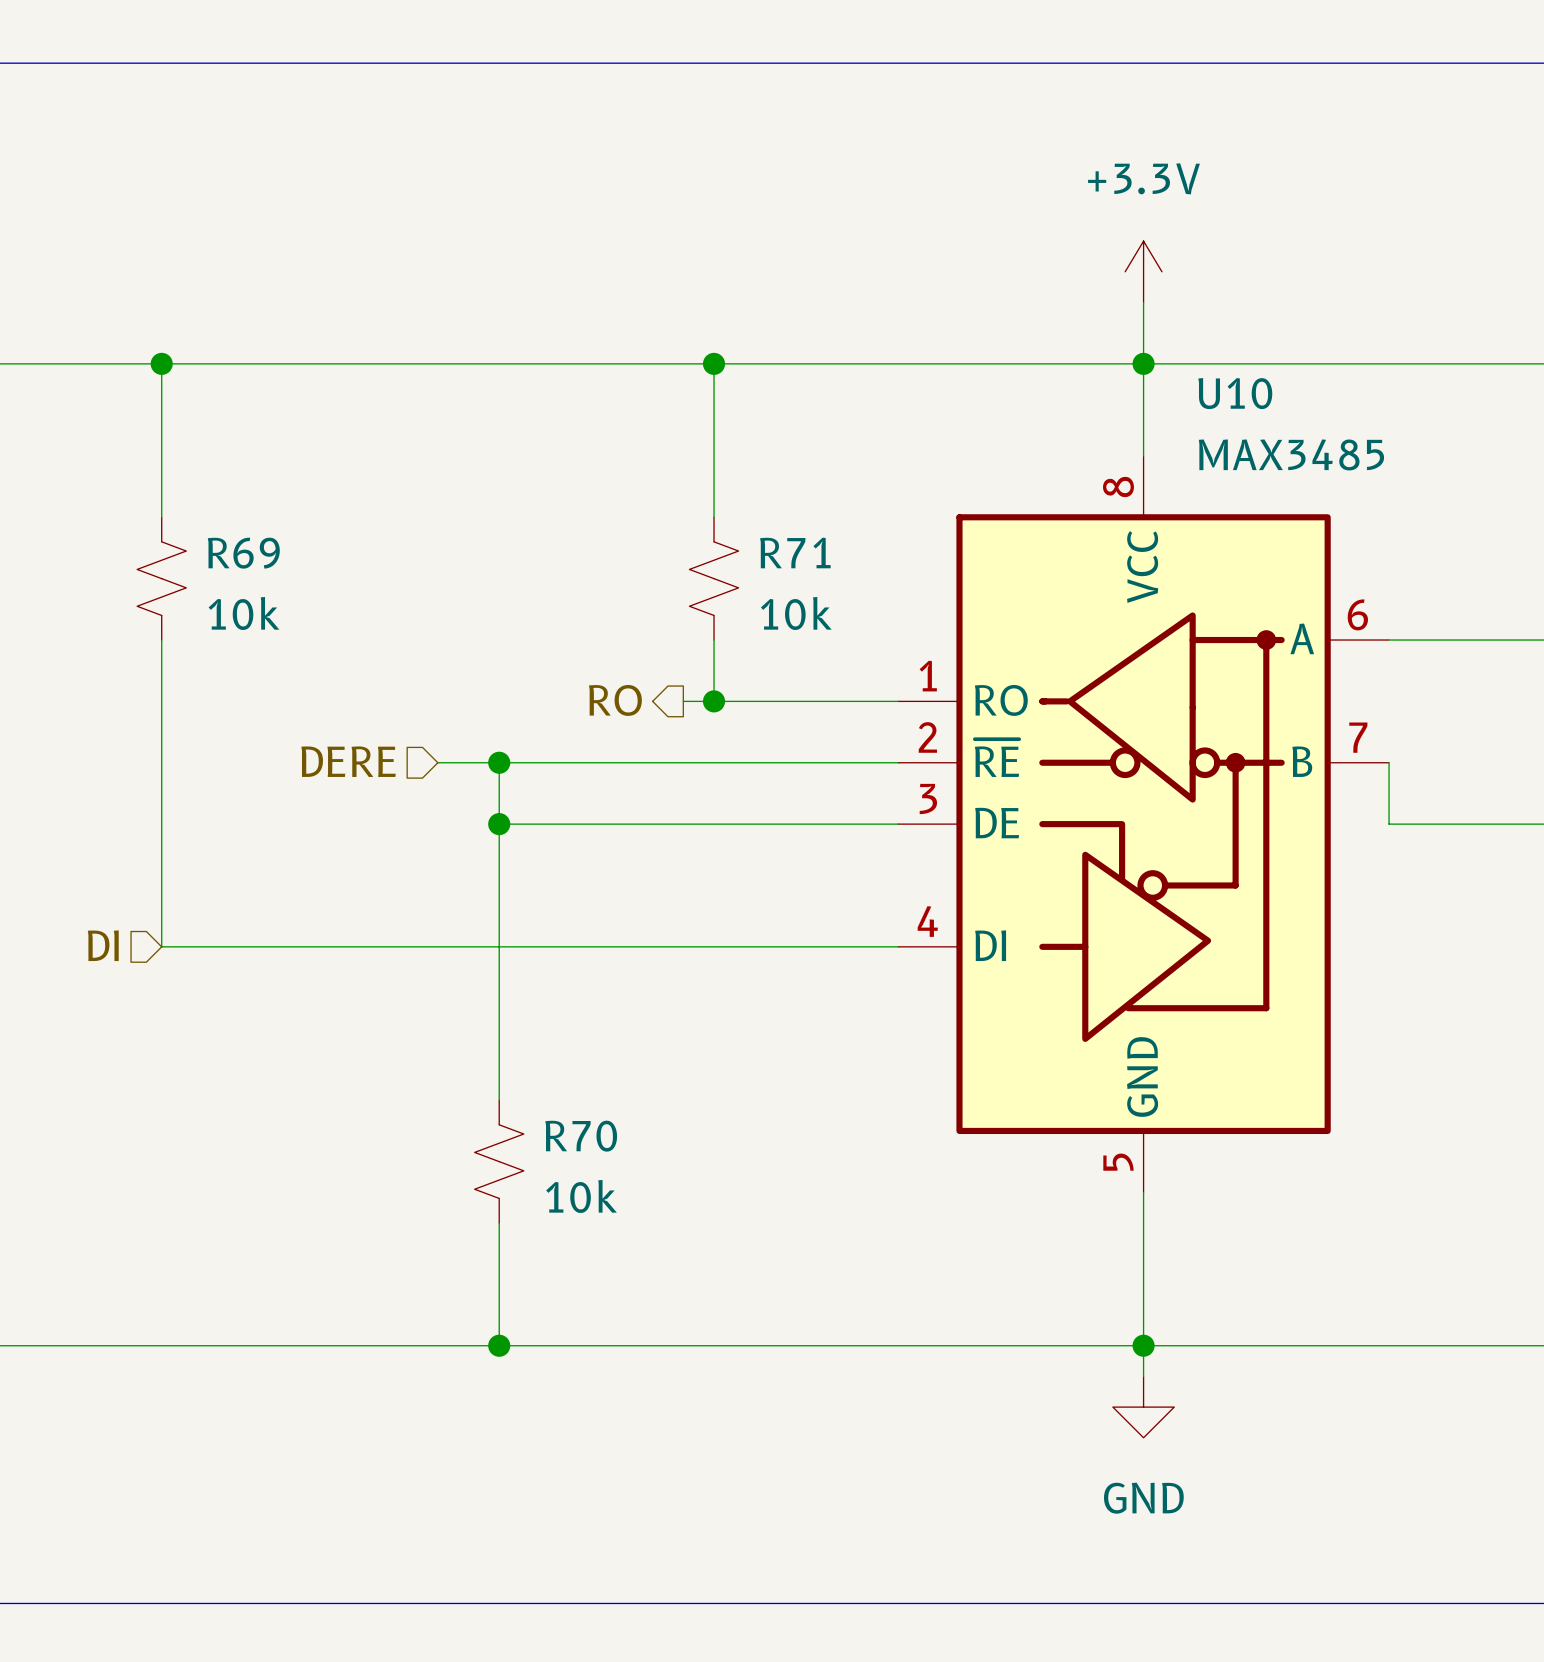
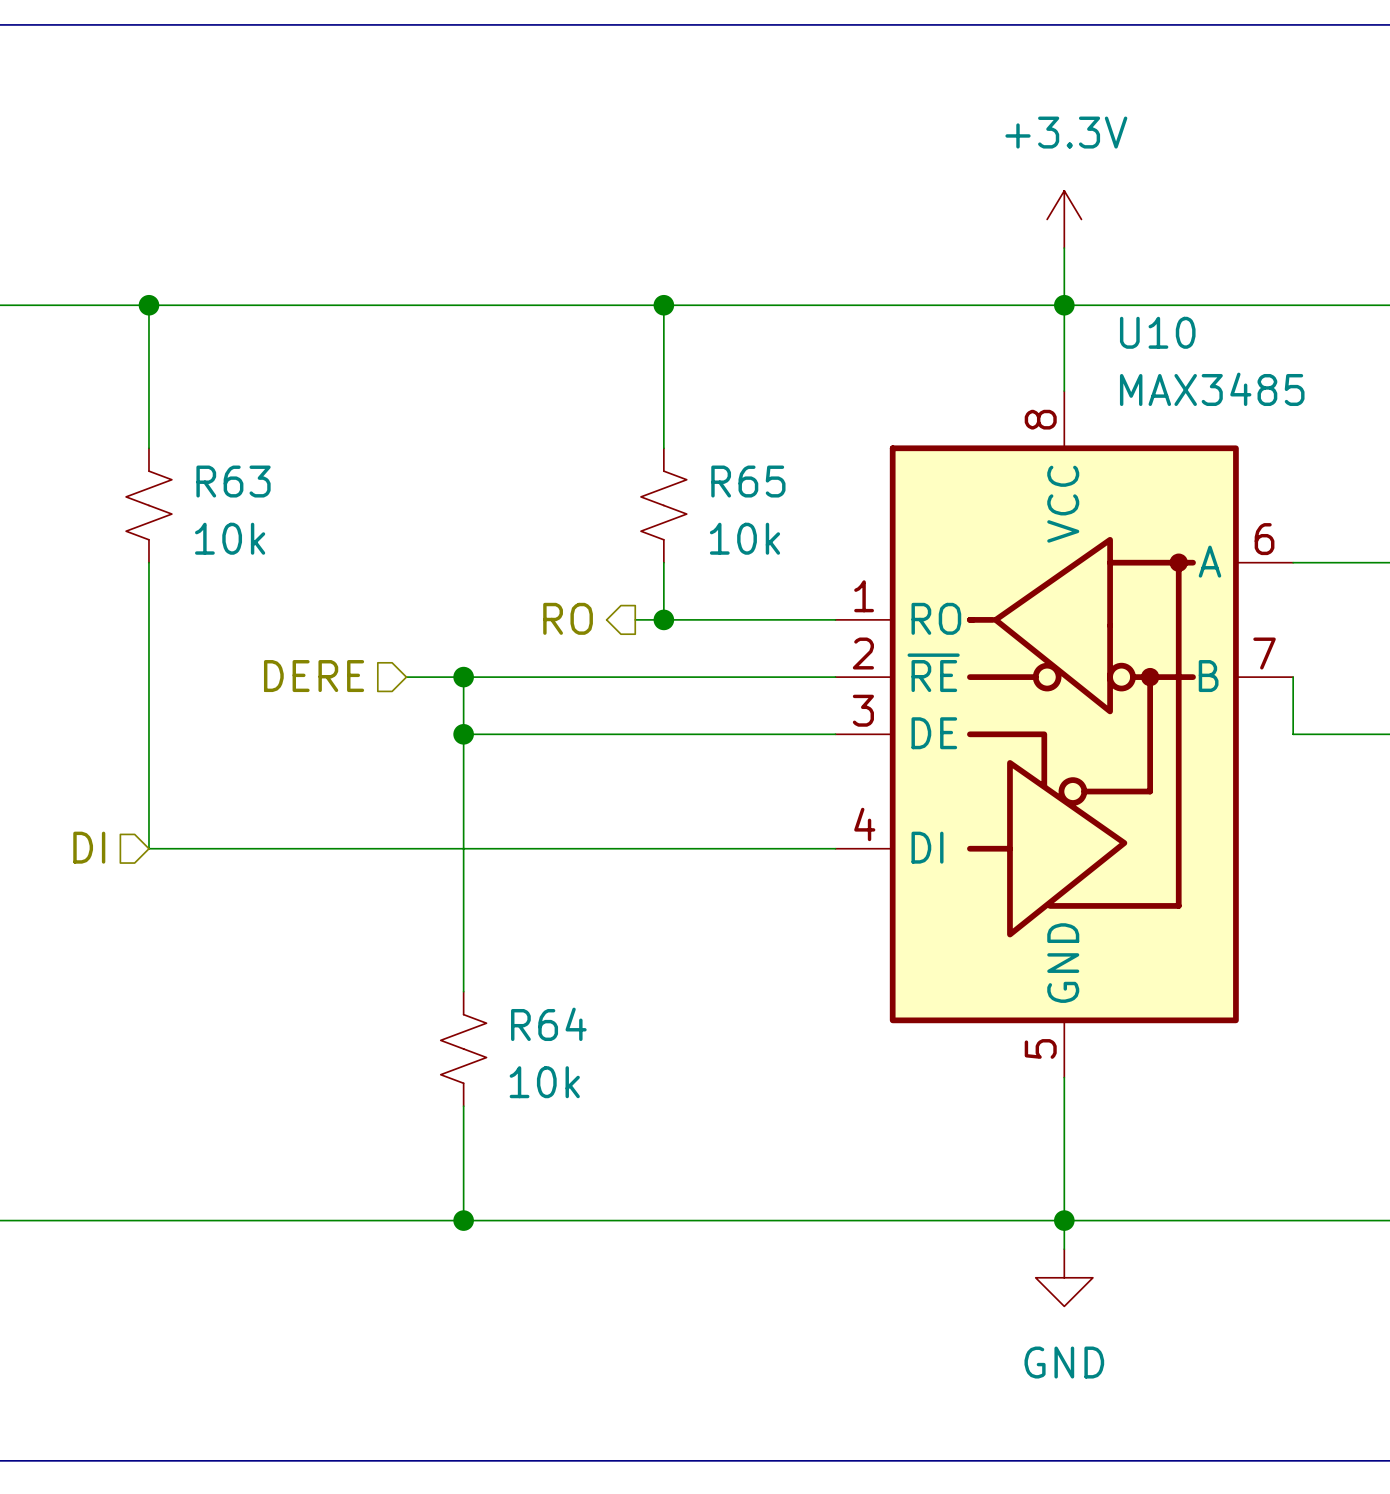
R71 name: R71 (795, 552) -> R65 (748, 481)
R69 name: R69 (243, 553) -> R63 (233, 481)
R70 name: R70 (581, 1136) -> R64 (548, 1024)

